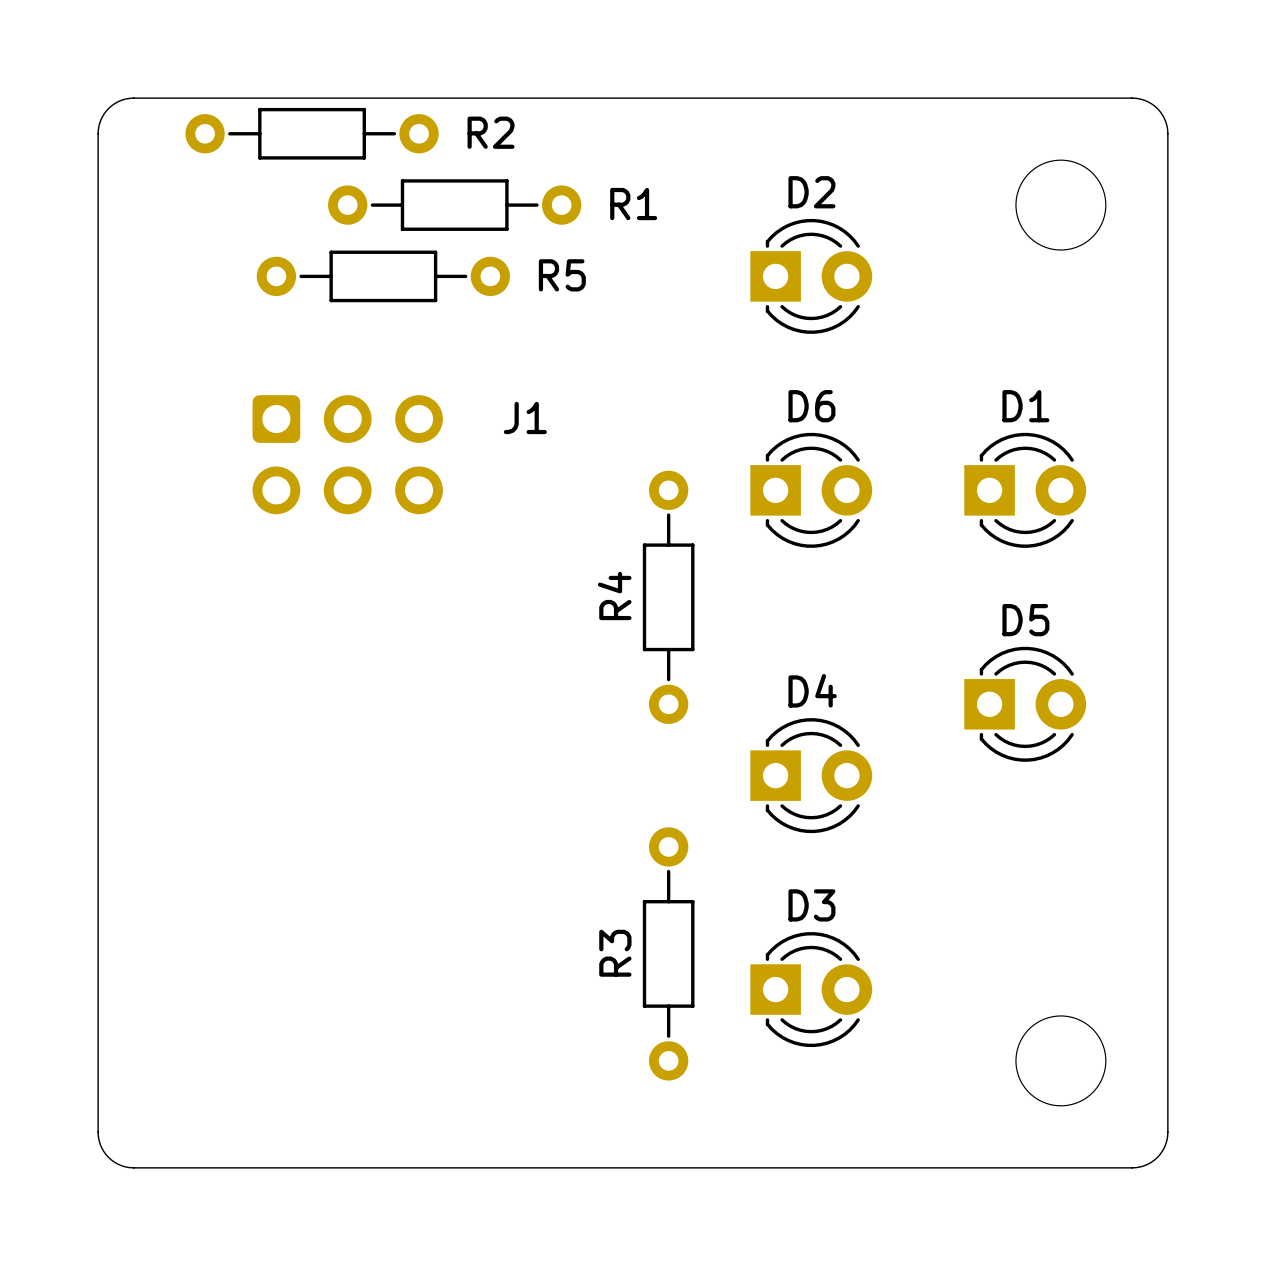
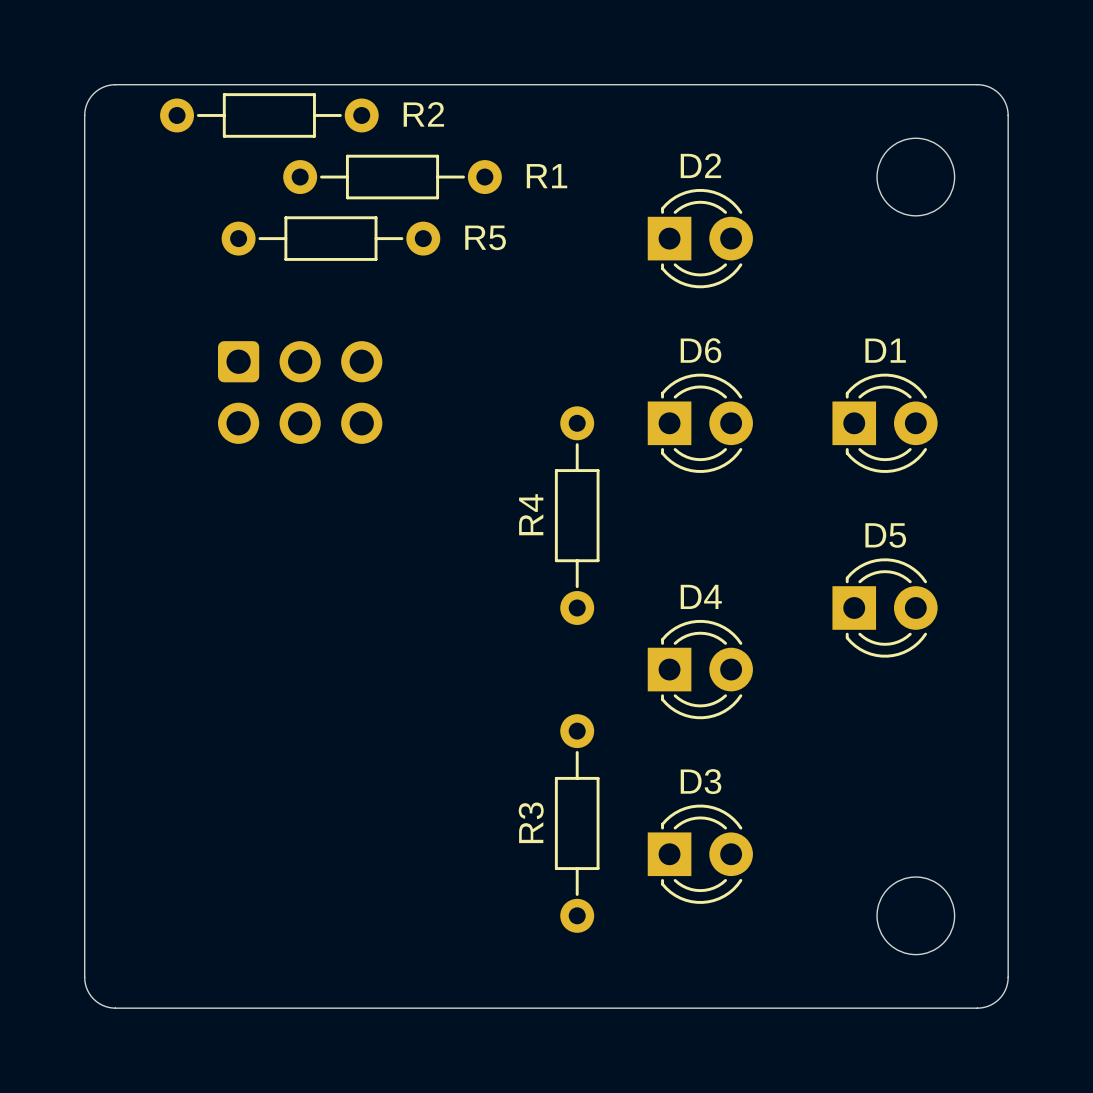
J1 name: J1 (525, 417) -> none

